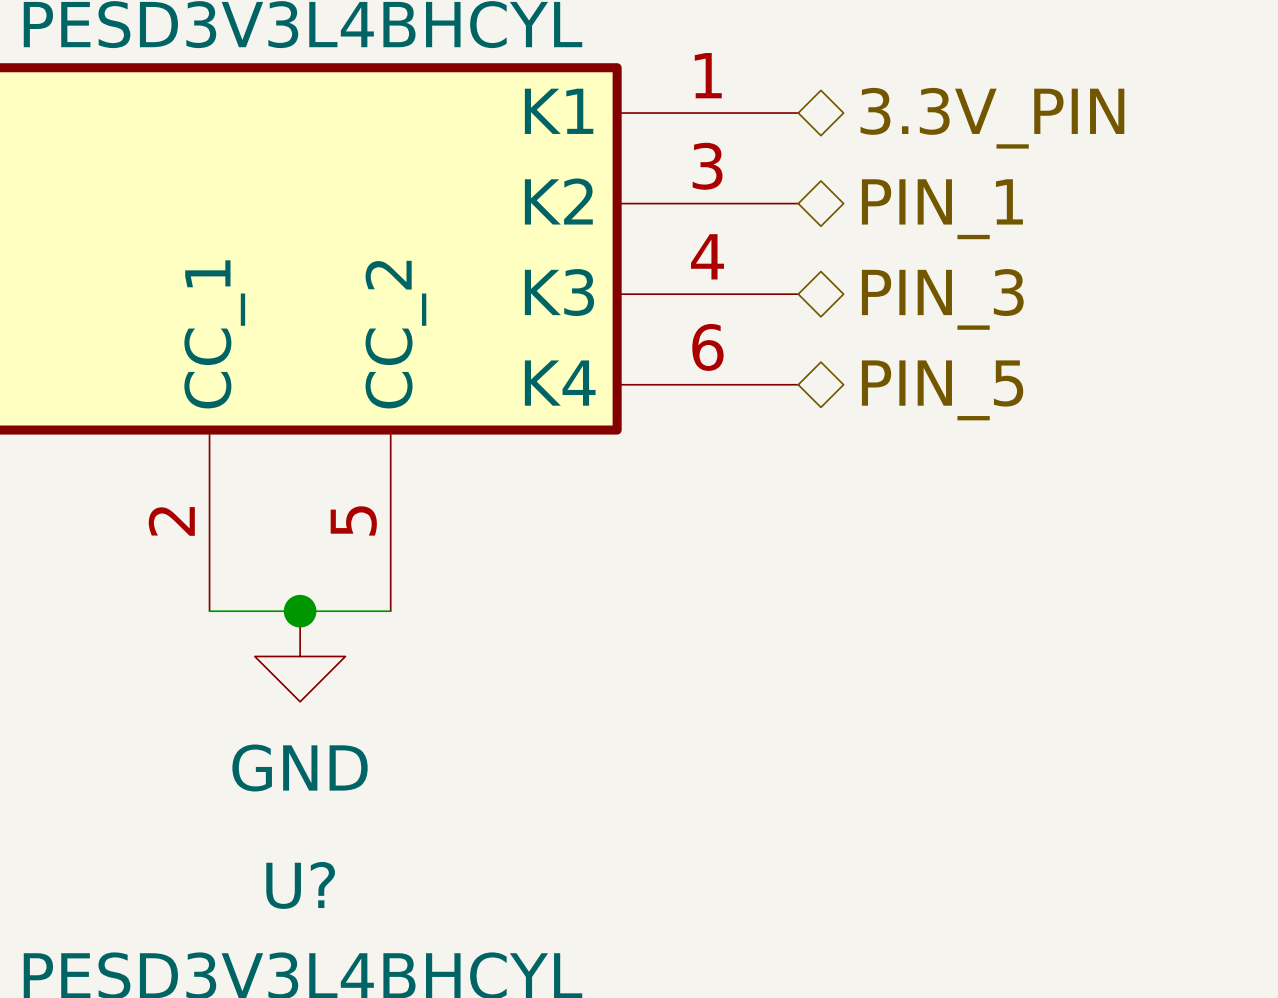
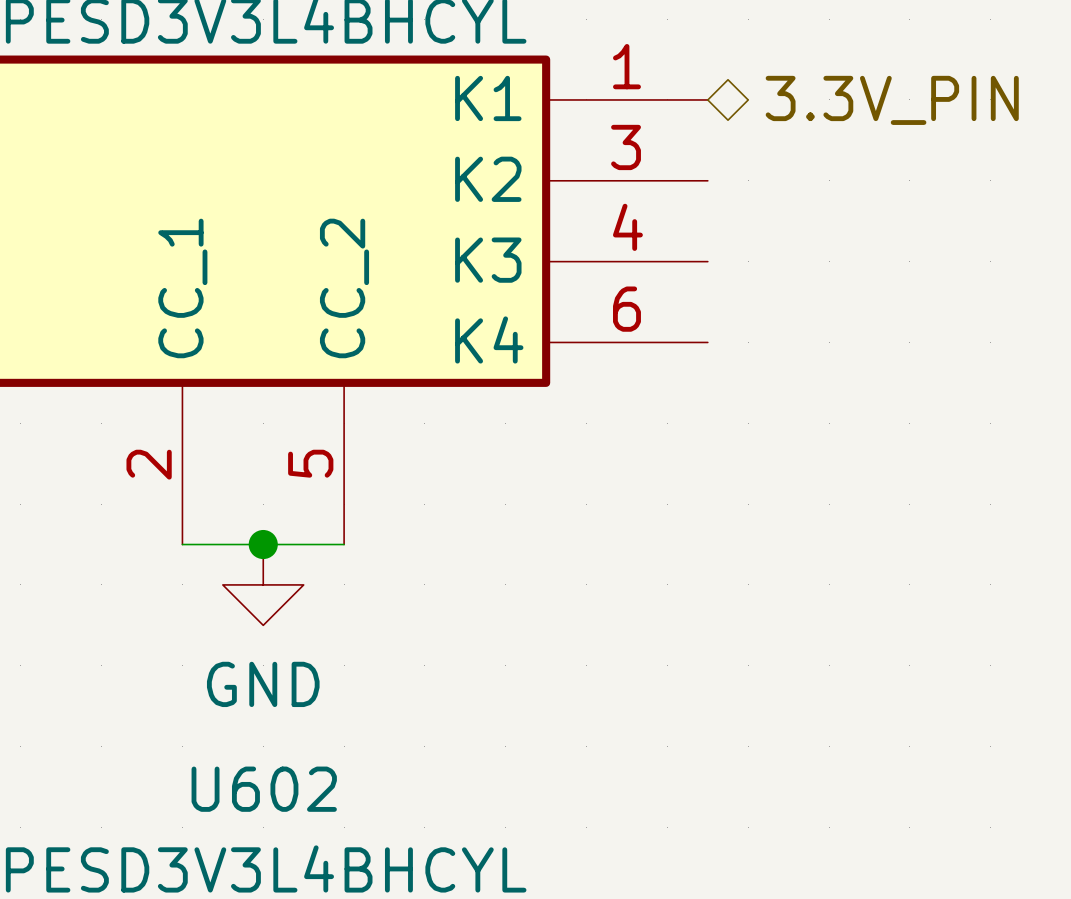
hierarchical label: PIN_1 (942, 209) -> none
hierarchical label: PIN_3 (942, 299) -> none
hierarchical label: PIN_5 (942, 390) -> none
U? name: U? (300, 885) -> U602 (264, 789)

